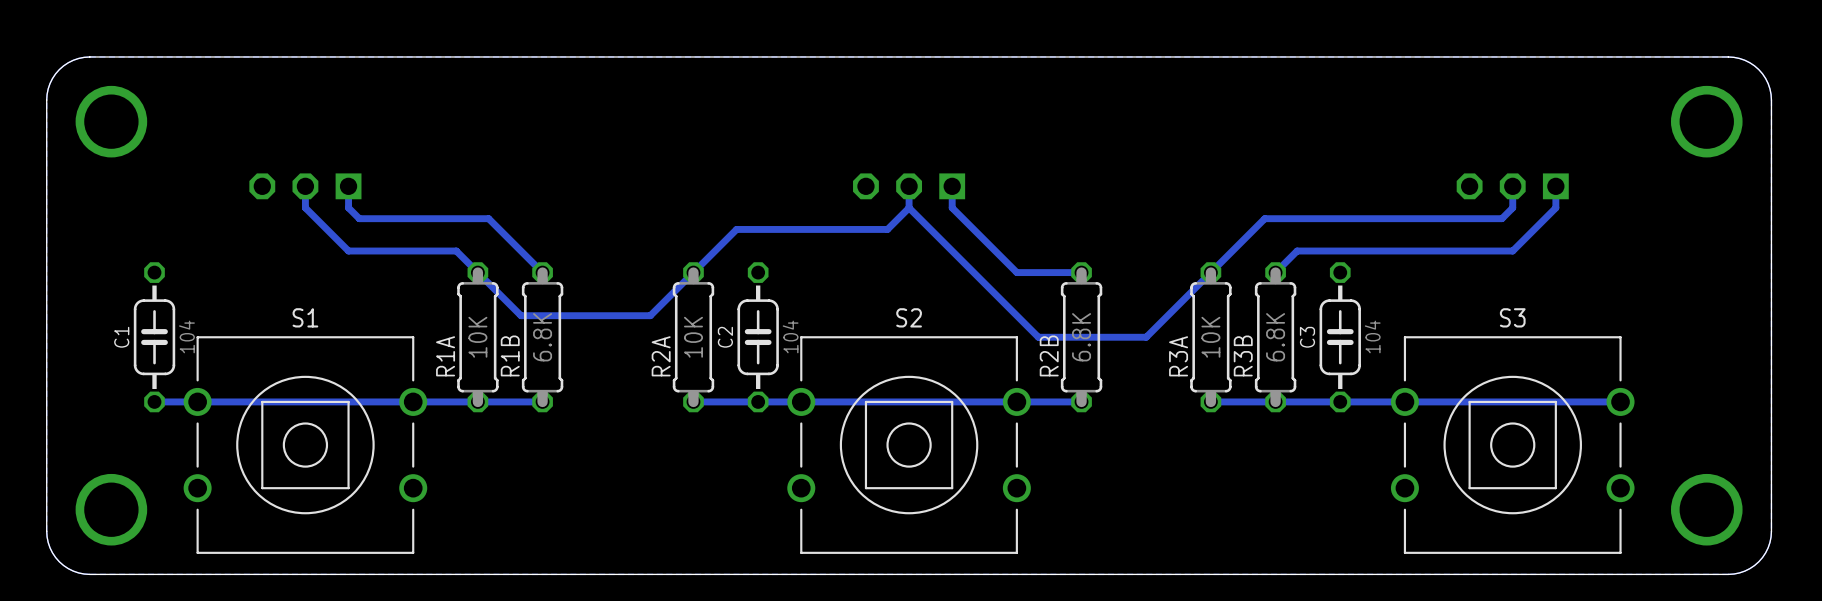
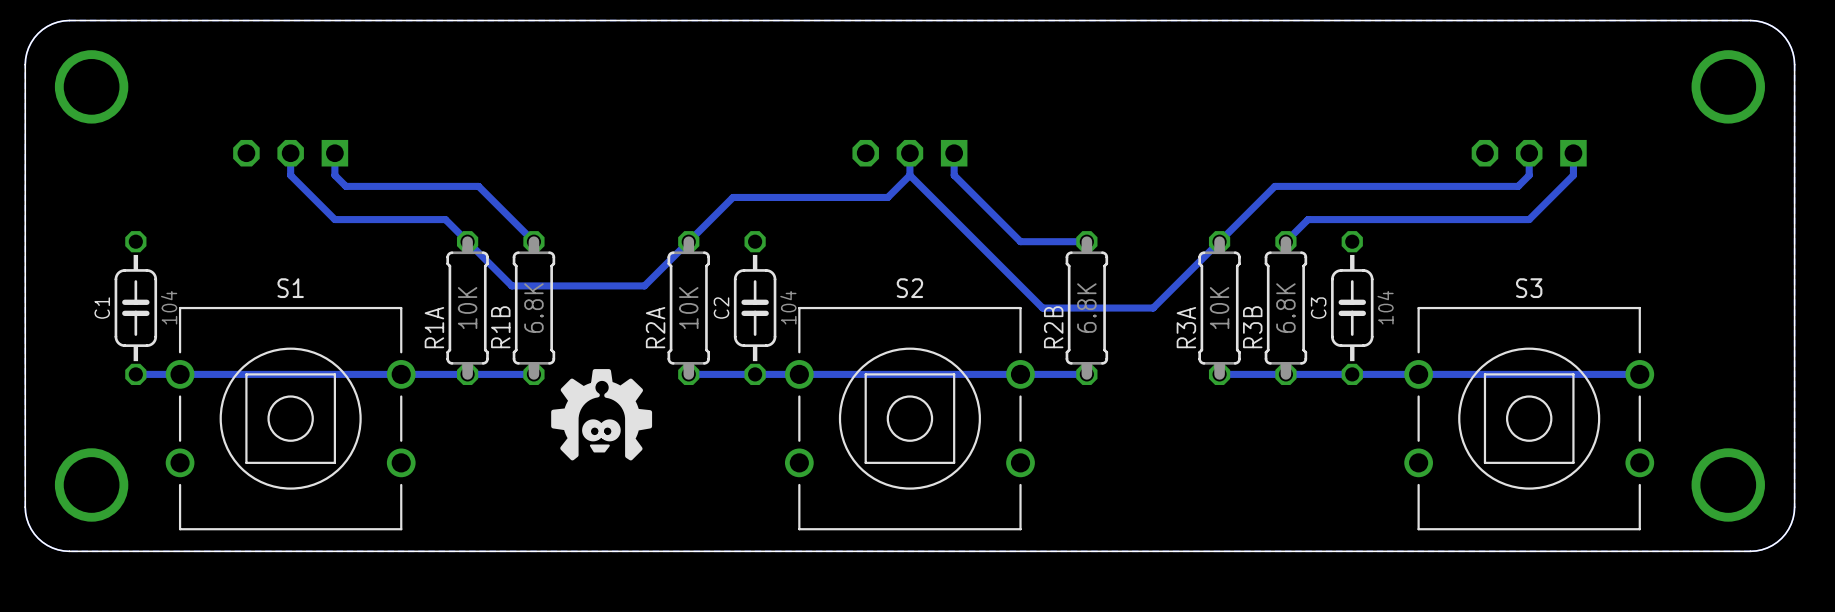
drawing: none -> [551, 369, 653, 461]

